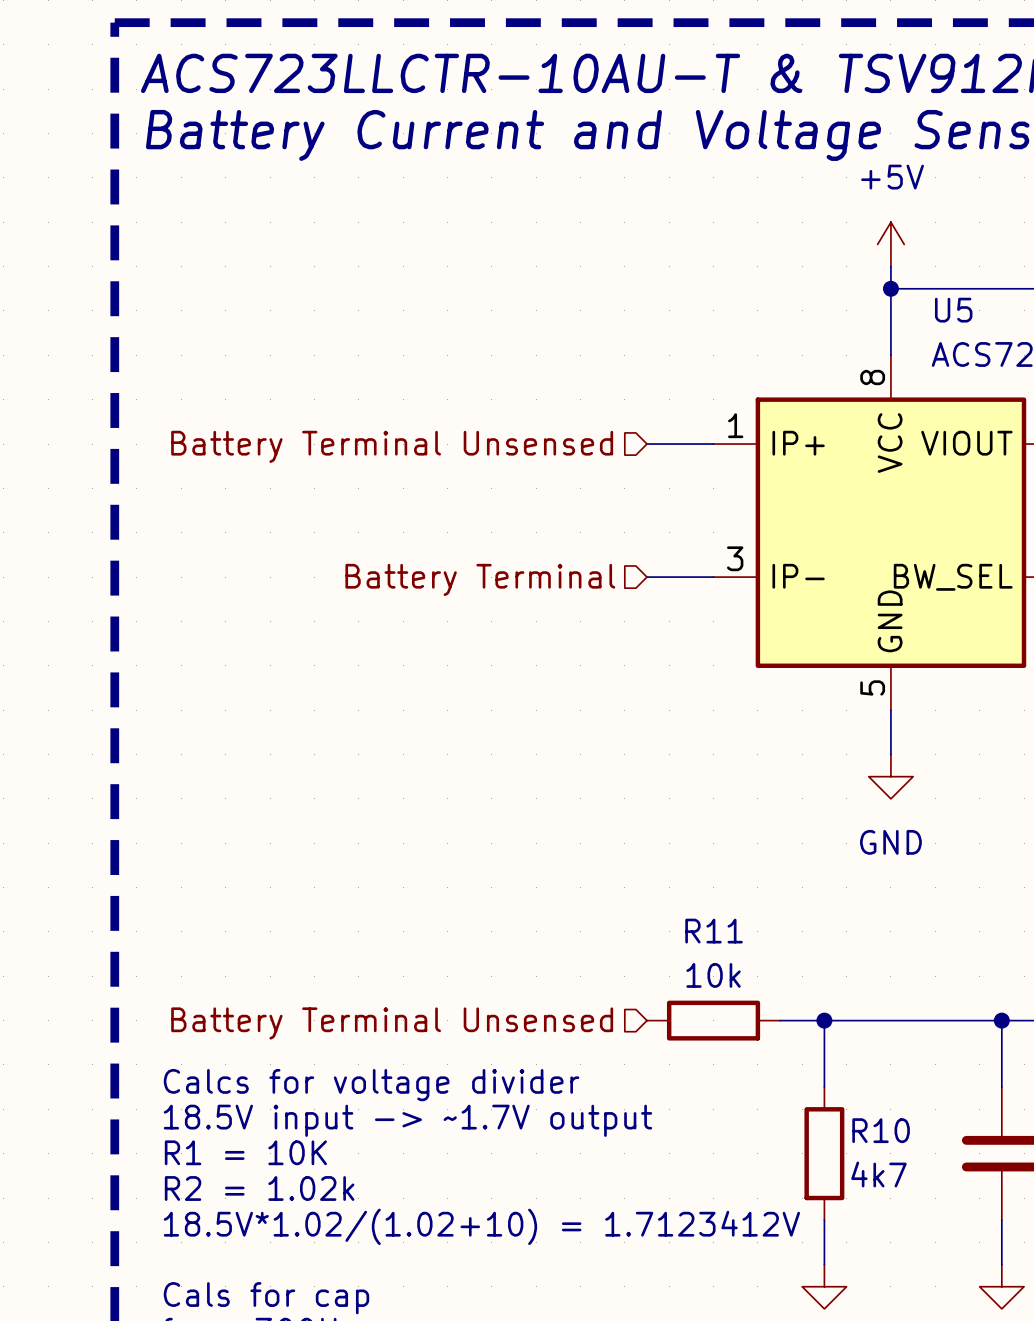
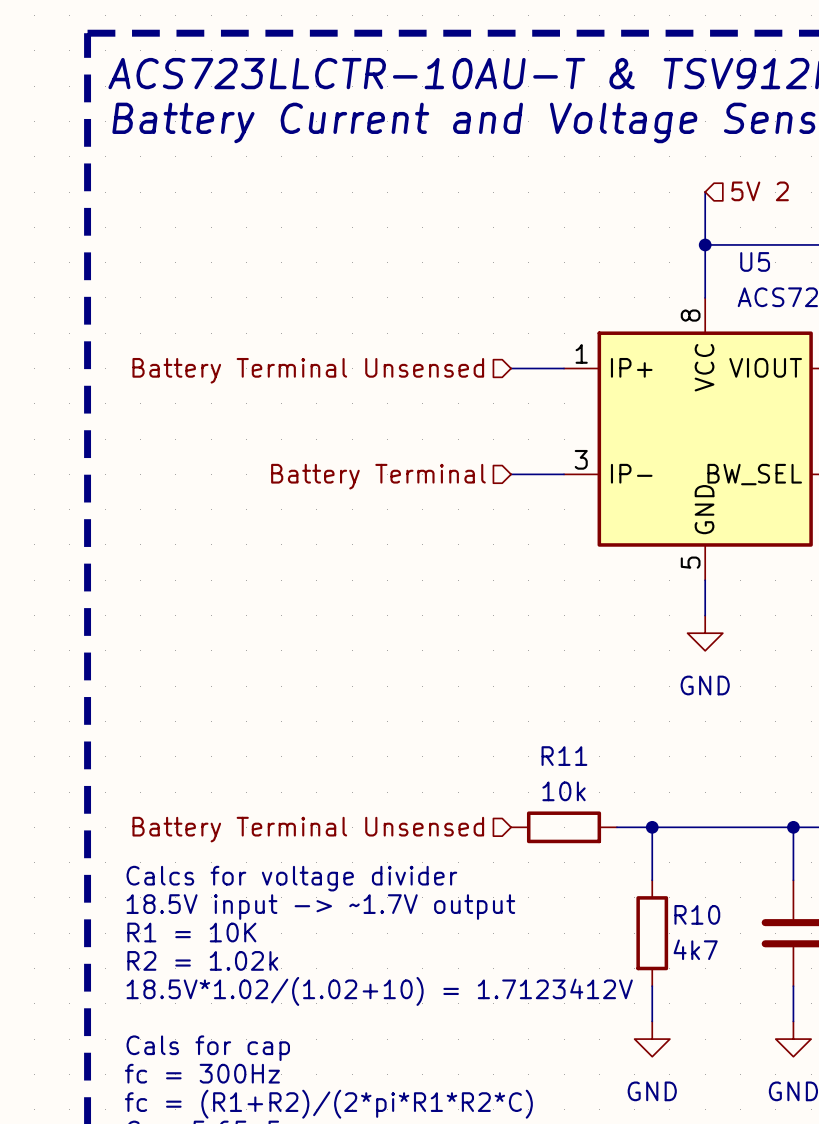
hierarchical label: none -> 5V 2 (760, 191)
power symbol: +5V (890, 244) -> none

